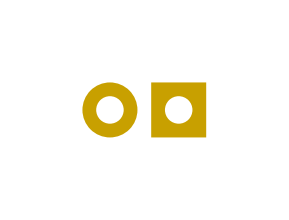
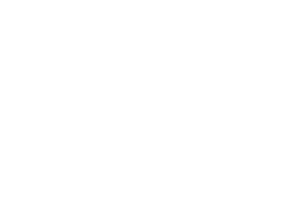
part: (144, 109) -> none

